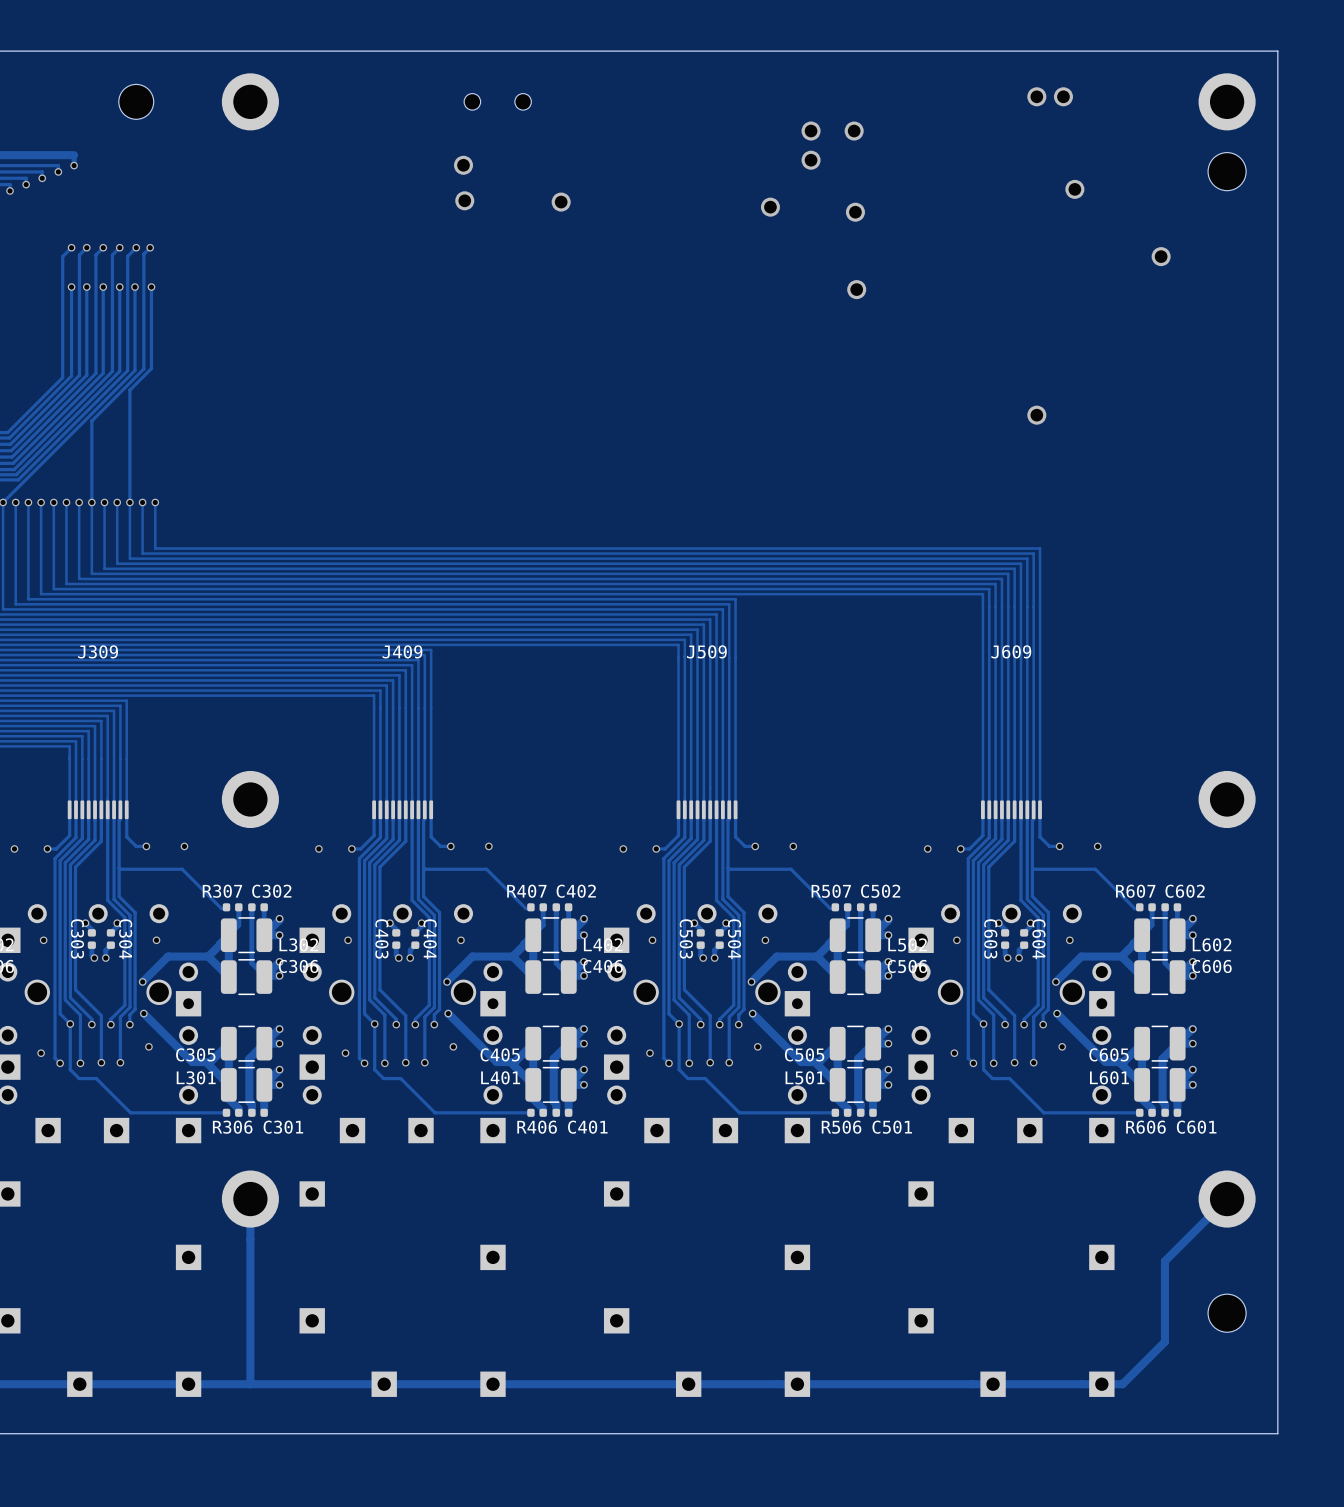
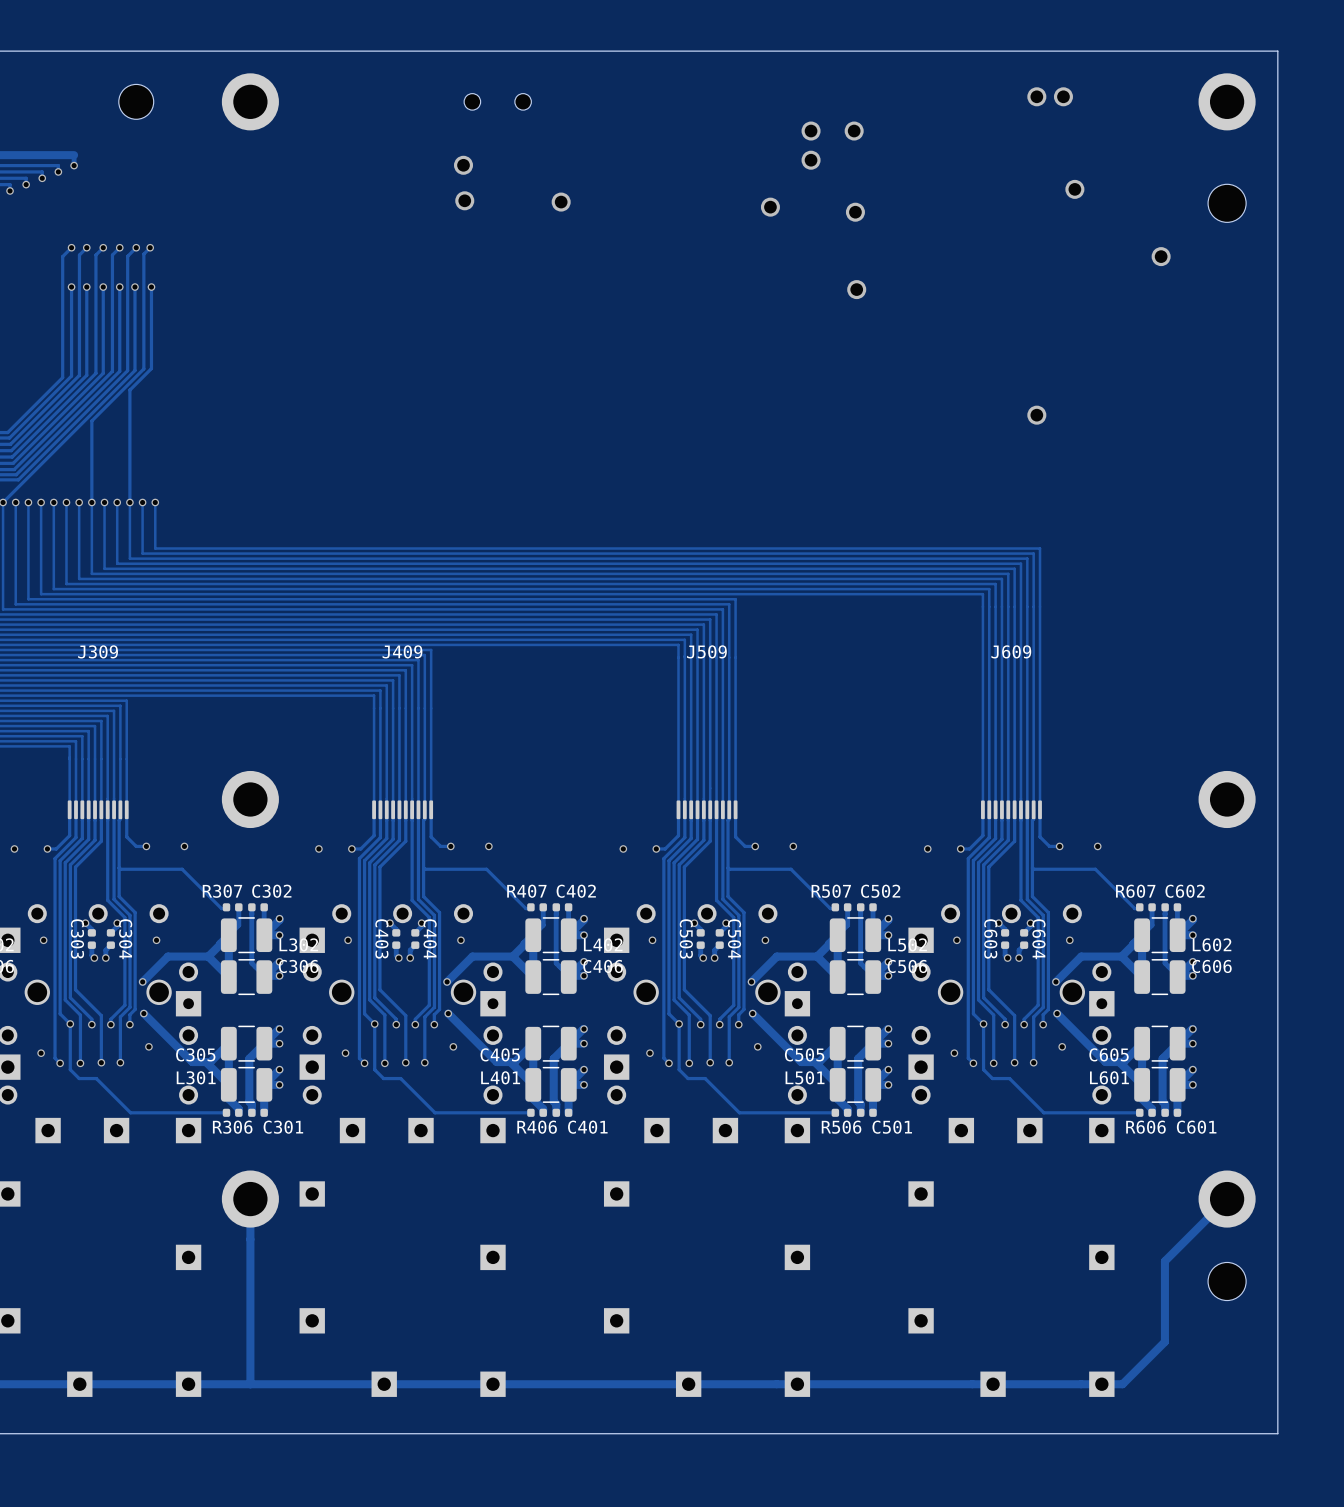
part position: (1227, 171) -> (1227, 203)
part position: (1227, 1313) -> (1227, 1281)

